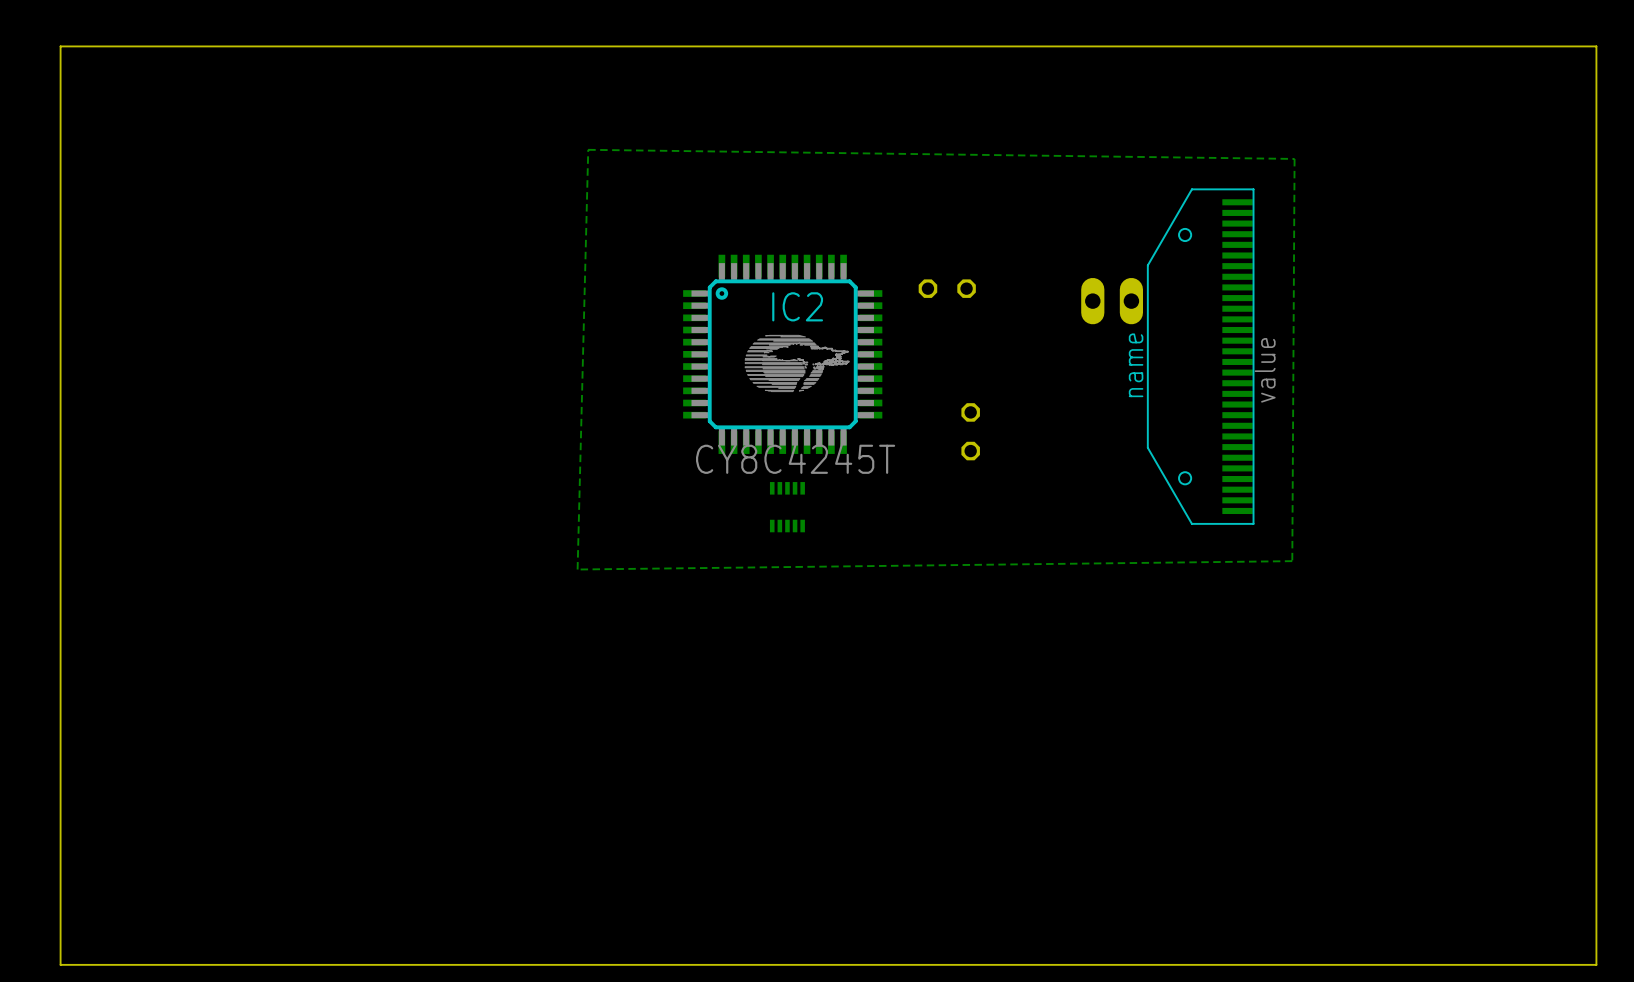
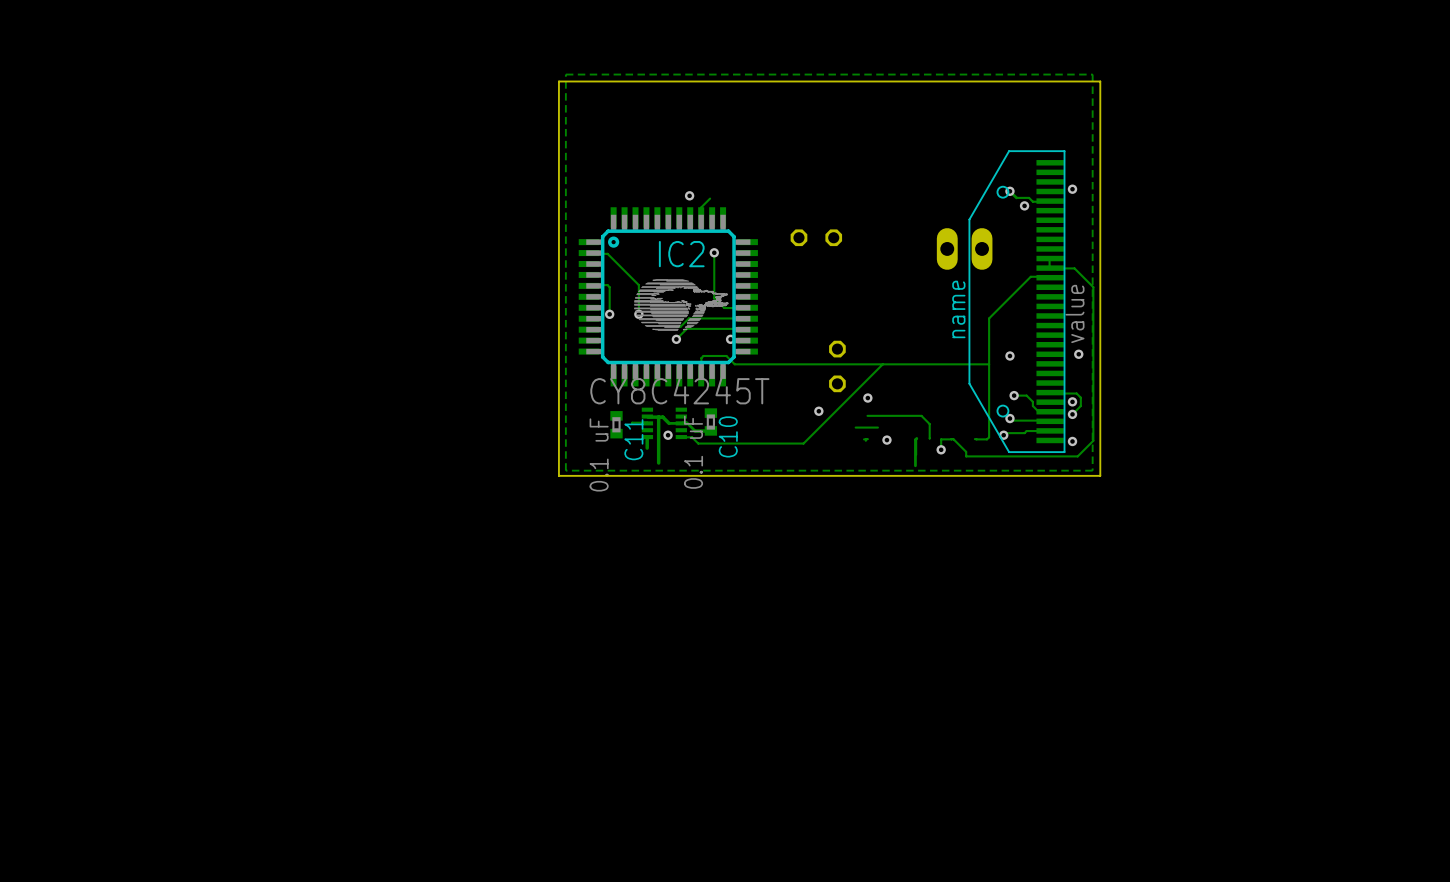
board edge: (1596, 46) (60, 46) (60, 964) (1596, 964) (1596, 46) -> none
board edge: none -> (1100, 81) (558, 81) (558, 475) (1100, 475) (1100, 81)
zone outline: (588, 149) (577, 569) (1292, 561) (1294, 158) (588, 149) -> (1092, 74) (1092, 470) (565, 470) (565, 74) (1092, 74)
via: none -> (1072, 189)
track: none -> (1009, 191) (1016, 197) (1029, 197) (1032, 201) (1050, 201)
via: none -> (1009, 191)
via: none -> (689, 195)
track: none -> (710, 198) (701, 207) (701, 217)
via: none -> (1024, 205)
track: none -> (589, 253) (607, 253) (638, 285) (638, 314)
track: none -> (714, 252) (714, 297) (724, 308) (747, 307)
via: none -> (714, 252)
track: none -> (1050, 258) (1050, 268) (1074, 268) (1093, 287) (1093, 440) (1077, 456) (966, 456) (966, 451) (951, 439) (941, 439) (941, 449)
track: none -> (1050, 277) (1030, 276) (989, 318) (989, 437) (987, 439) (974, 439)
track: none -> (589, 285) (607, 285) (609, 287) (609, 314)
part position: (1200, 356) -> (1016, 301)
via: none -> (609, 314)
via: none -> (638, 314)
track: none -> (747, 318) (688, 318) (680, 326) (676, 326)
track: none -> (747, 329) (686, 328) (676, 339)
via: none -> (676, 339)
via: none -> (730, 339)
via: none -> (1078, 354)
via: none -> (1009, 355)
track: none -> (882, 364) (803, 443) (698, 443) (692, 437) (681, 437)
track: none -> (989, 364) (734, 364) (726, 355) (703, 355) (701, 358) (701, 376)
track: none -> (1050, 392) (1076, 393) (1080, 397) (1080, 406) (1072, 414)
track: none -> (1014, 395) (1026, 395) (1039, 412) (1050, 411)
via: none -> (1014, 395)
via: none -> (867, 398)
via: none -> (1072, 401)
via: none -> (818, 411)
via: none -> (1072, 414)
track: none -> (867, 415) (921, 415) (929, 424) (929, 438)
track: none -> (647, 416) (662, 417) (669, 423) (686, 422) (695, 431) (710, 430)
track: none -> (658, 417) (658, 463)
track: none -> (1009, 418) (1012, 420) (1050, 421)
via: none -> (1009, 418)
C10: none -> 0.1 uF (710, 422)
track: none -> (647, 422) (631, 423)
C11: none -> 0.1 uF (616, 424)
track: none -> (877, 427) (855, 427)
track: none -> (1050, 430) (1005, 433) (1001, 437)
part rotation: 0° (787, 507) -> 90° clockwise (664, 423)
via: none -> (668, 435)
via: none -> (1003, 435)
track: none -> (647, 437) (647, 448)
track: none -> (864, 439) (867, 439) (865, 440)
via: none -> (886, 440)
via: none -> (1072, 441)
via: none -> (941, 449)
track: none -> (916, 454) (916, 438) (915, 465)

